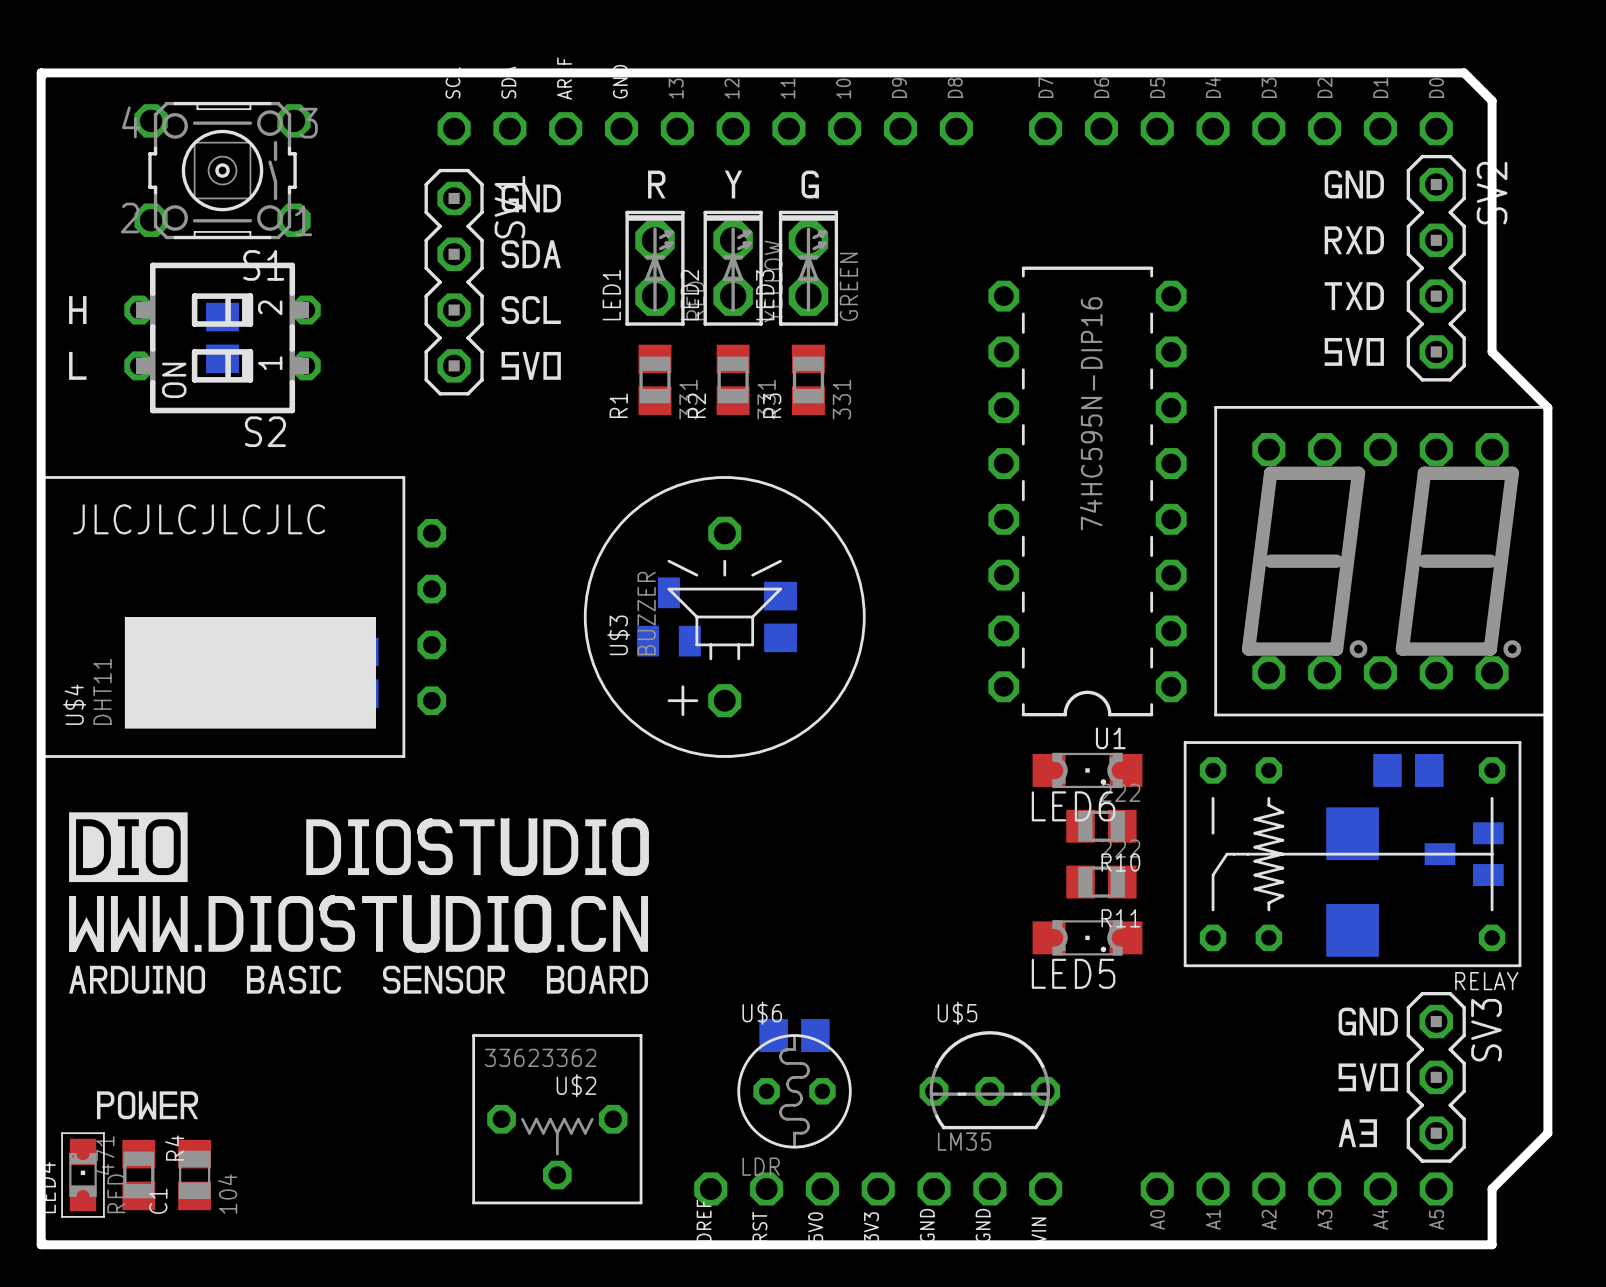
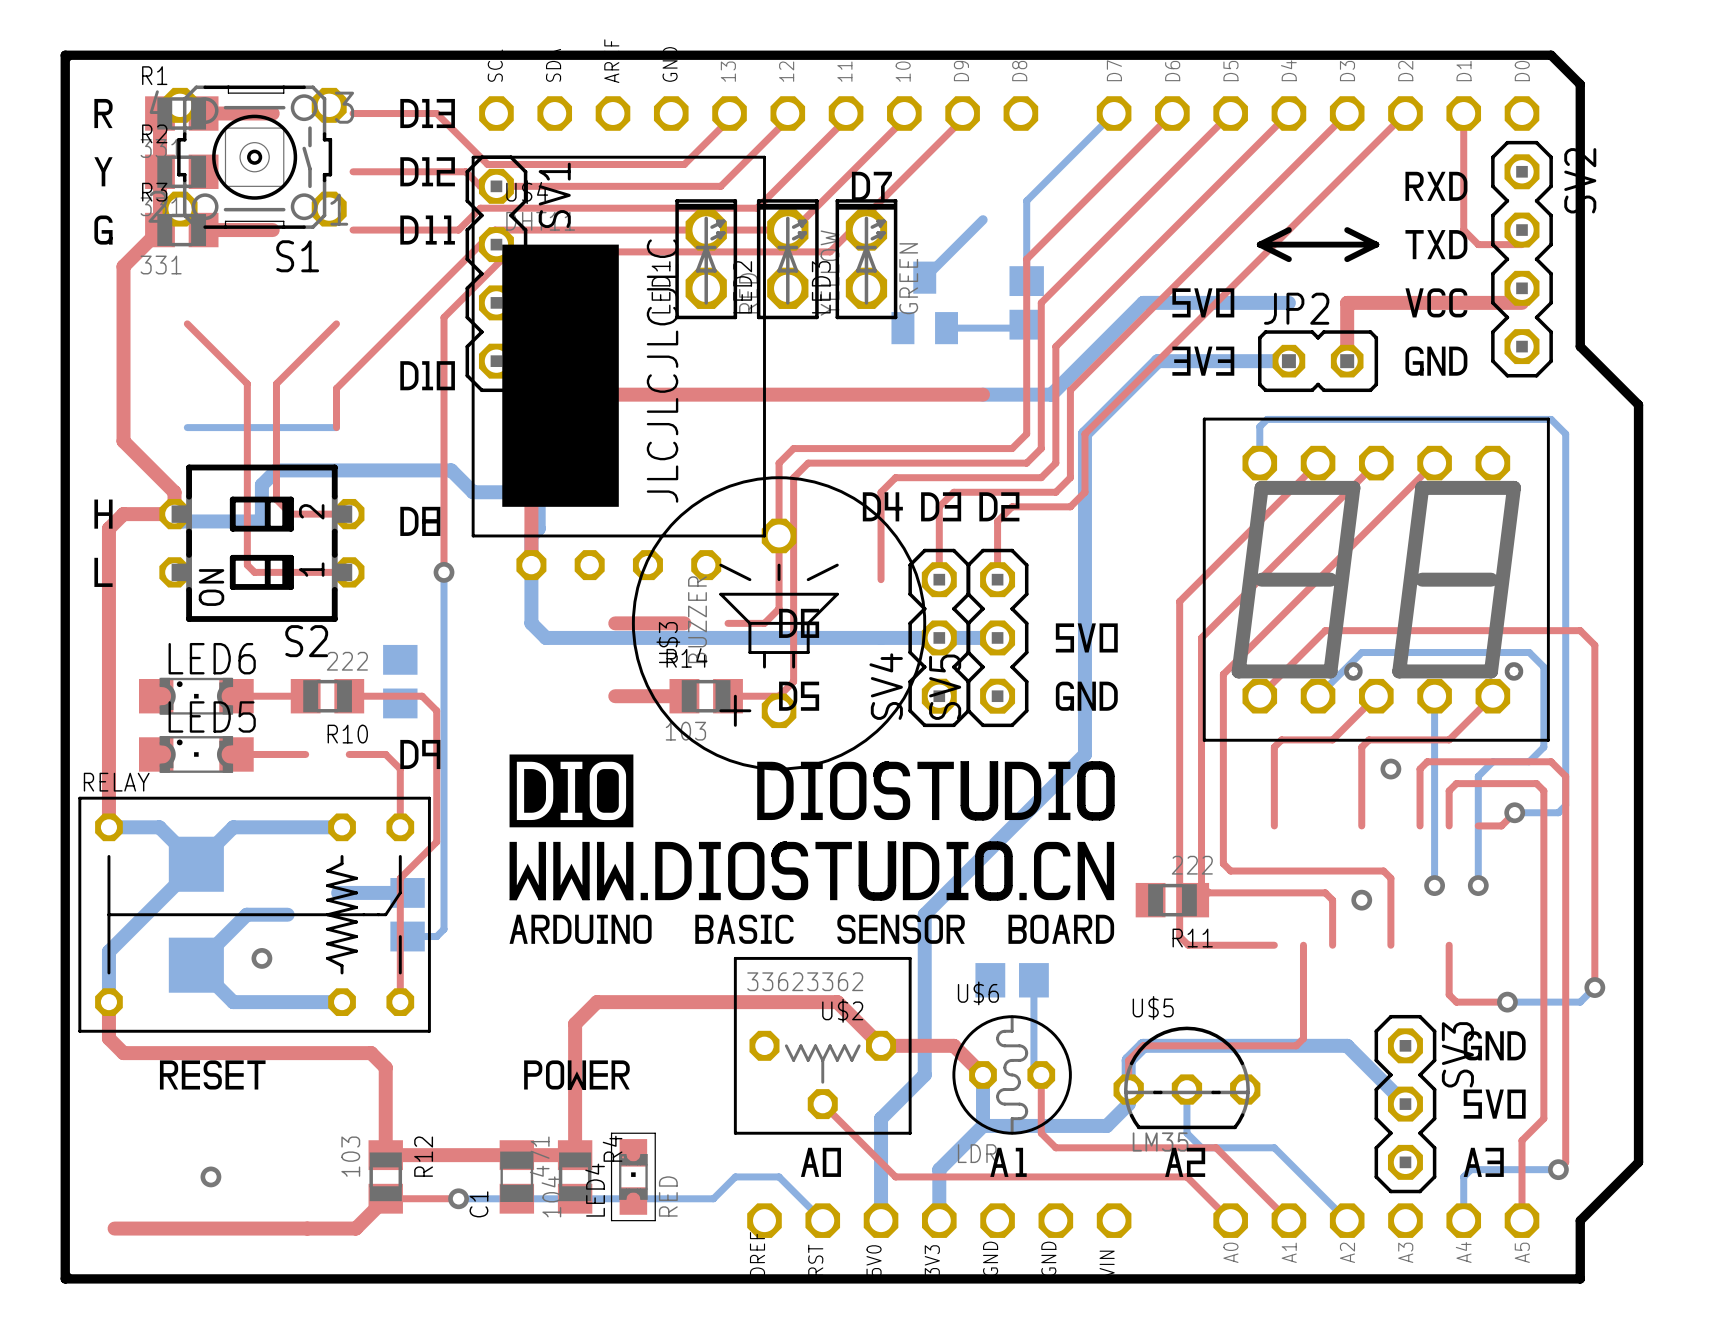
drawing: none -> [94, 98, 113, 129]
drawing: none -> [400, 98, 455, 129]
top track: none -> (160, 113) (160, 230) (123, 266) (123, 441) (174, 492) (174, 514) (123, 514) (108, 528) (108, 827)
top track: none -> (203, 113) (272, 113)
top track: none -> (353, 113) (436, 113) (487, 164) (684, 164) (735, 113)
top track: none -> (793, 113) (720, 186) (480, 186) (465, 171) (353, 171)
top track: none -> (851, 113) (757, 208) (480, 208) (458, 230) (353, 230)
top track: none -> (910, 113) (793, 230) (494, 230) (336, 388) (336, 427)
top track: none -> (968, 113) (830, 251) (509, 251) (444, 317) (444, 572)
bottom track: none -> (1114, 113) (1026, 200) (1026, 281)
top track: none -> (1172, 113) (1026, 259) (1026, 433) (1012, 448) (793, 448) (779, 463) (779, 608) (764, 623) (728, 623)
top track: none -> (1230, 113) (1041, 302) (1041, 448) (1026, 463) (808, 463) (793, 477) (793, 681) (779, 696) (728, 696)
top track: none -> (1288, 113) (1055, 346) (1055, 463) (1041, 477) (895, 477) (881, 492) (881, 579)
top track: none -> (1347, 113) (1070, 390) (1070, 477) (1055, 492) (953, 492) (939, 506) (939, 579)
top track: none -> (1405, 113) (1084, 433) (1084, 492) (1070, 506) (1012, 506) (997, 521) (997, 579)
top track: none -> (1463, 113) (1463, 230) (1478, 244) (1522, 244)
drawing: none -> [94, 157, 113, 187]
drawing: none -> [400, 157, 455, 187]
drawing: [648, 170, 666, 199] -> none
drawing: [724, 170, 743, 199] -> none
drawing shape: [801, 170, 819, 199] -> [851, 171, 892, 201]
drawing: [501, 184, 561, 213] -> none
drawing position: (1354, 184) -> (1436, 361)
drawing: none -> [94, 215, 113, 245]
drawing: none -> [400, 215, 455, 245]
bottom track: none -> (983, 219) (925, 277)
top track: none -> (203, 230) (272, 230)
drawing: [501, 240, 561, 269] -> none
line: none -> (1288, 230) (1259, 244)
line: none -> (1347, 230) (1376, 244)
drawing position: (1354, 240) -> (1436, 186)
line: none -> (1259, 244) (1376, 244)
line: none -> (1259, 244) (1288, 259)
line: none -> (1376, 244) (1347, 259)
drawing: [501, 296, 561, 325] -> none
drawing: none -> [1172, 288, 1235, 318]
drawing: none -> [1405, 288, 1468, 318]
drawing position: (1354, 296) -> (1436, 244)
drawing position: (77, 310) -> (103, 514)
part: none -> (1026, 302)
bottom track: none -> (1288, 302) (1143, 302) (1051, 394) (983, 394)
top track: none -> (1522, 302) (1347, 302) (1347, 361)
top track: none -> (187, 323) (247, 383) (247, 565) (254, 572) (349, 572)
top track: none -> (336, 323) (276, 383) (276, 499) (291, 514) (349, 514)
bottom track: none -> (1026, 324) (1023, 328) (946, 328)
S2 position: (222, 337) -> (261, 543)
part: (222, 337) -> none
drawing: [1324, 337, 1384, 366] -> none
drawing: [501, 351, 561, 380] -> none
drawing: none -> [1172, 346, 1235, 376]
drawing position: (77, 365) -> (103, 572)
drawing: none -> [400, 361, 455, 391]
bottom track: none -> (1288, 361) (1157, 361) (1084, 433) (1084, 754) (924, 914) (924, 1074) (881, 1118) (881, 1220)
JP2: none -> (1318, 361)
text: none -> JLCJLCJLCJLC (662, 371)
R1 rotation: 0° (655, 379) -> 90° clockwise (181, 113)
R1 position: (655, 379) -> (181, 113)
R2 rotation: 0° (733, 379) -> 90° clockwise (181, 171)
R2 position: (733, 379) -> (181, 171)
R3 rotation: 0° (808, 379) -> 90° clockwise (181, 230)
R3 position: (808, 379) -> (181, 230)
top track: none -> (983, 394) (548, 394) (531, 412) (531, 565)
bottom track: none -> (187, 427) (336, 427)
bottom track: none -> (1259, 463) (1259, 426) (1267, 419) (1551, 419) (1565, 433) (1565, 805) (1558, 812) (1514, 812)
top track: none -> (1318, 463) (1179, 601) (1179, 936) (1188, 945) (1274, 945)
top track: none -> (1376, 463) (1201, 637) (1201, 885) (1208, 892) (1325, 892) (1332, 900) (1332, 945)
top track: none -> (1434, 463) (1223, 674) (1223, 863) (1230, 871) (1383, 871) (1390, 878) (1390, 945)
drawing: none -> [862, 492, 1020, 522]
U1: 74HC595N-DIP16 (1087, 491) -> none
drawing: none -> [400, 506, 441, 536]
bottom track: none -> (174, 514) (181, 521) (261, 521) (261, 484) (276, 470) (451, 470) (473, 492) (538, 492) (538, 528) (531, 535) (531, 623) (545, 637) (997, 637)
text: JLCJLCJLCJLC (199, 519) -> none
part position: (1380, 561) -> (1376, 579)
bottom track: none -> (444, 572) (444, 929) (436, 936) (407, 936)
via: none -> (444, 572)
drawing: none -> [779, 608, 820, 638]
U$4 rotation: 0° (242, 616) -> 90° clockwise (618, 367)
U$4 position: (242, 616) -> (618, 367)
top track: none -> (615, 623) (684, 623)
part position: (668, 616) -> (924, 302)
part: (780, 616) -> none
drawing: none -> [1055, 623, 1118, 653]
SV4: none -> (939, 637)
SV5: none -> (997, 637)
drawing: none -> [779, 681, 820, 711]
drawing: none -> [1055, 681, 1118, 711]
top track: none -> (236, 696) (305, 696)
top track: none -> (349, 696) (422, 696) (436, 710) (436, 841) (400, 878) (400, 1002)
top track: none -> (615, 696) (684, 696)
R14: none -> 103 (706, 696)
top track: none -> (1259, 696) (1325, 630) (1580, 630) (1594, 645) (1594, 987)
bottom track: none -> (1318, 696) (1361, 652) (1529, 652) (1543, 667) (1543, 747) (1529, 761) (1492, 761) (1478, 776) (1478, 885)
top track: none -> (1376, 696) (1332, 739) (1281, 739) (1274, 747) (1274, 825)
bottom track: none -> (1434, 696) (1434, 885)
top track: none -> (1492, 696) (1449, 739) (1369, 739) (1361, 747) (1361, 825)
drawing: none -> [400, 739, 441, 770]
top track: none -> (236, 754) (305, 754)
top track: none -> (349, 754) (385, 754) (400, 769) (400, 827)
via: none -> (1390, 769)
LED6 rotation: 0° (1087, 770) -> 180° (196, 696)
LED6 position: (1087, 770) -> (196, 696)
part: (1408, 770) -> none
top track: none -> (1514, 812) (1501, 825) (1478, 825)
via: none -> (1514, 812)
top track: none -> (1420, 825) (1420, 769) (1427, 761) (1551, 761) (1565, 776) (1565, 1162) (1558, 1169)
top track: none -> (1449, 825) (1449, 790) (1456, 783) (1536, 783) (1543, 790) (1543, 1118) (1522, 1140) (1522, 1220)
bottom track: none -> (108, 827) (159, 827) (196, 864)
bottom track: none -> (342, 827) (233, 827) (108, 951) (108, 1002)
R10 position: (1101, 826) -> (327, 696)
drawing position: (128, 847) -> (571, 790)
drawing position: (477, 847) -> (935, 790)
RELAY: (1352, 854) -> none
part: (1464, 854) -> none
via: none -> (1434, 885)
via: none -> (1478, 885)
bottom track: none -> (338, 892) (407, 892)
via: none -> (1361, 900)
part: (1352, 882) -> none
part: none -> (196, 914)
RELAY: none -> (254, 914)
bottom track: none -> (287, 914) (246, 914) (196, 965) (233, 1002) (342, 1002)
part: none -> (407, 914)
drawing position: (358, 923) -> (811, 871)
top track: none -> (1303, 945) (1303, 1038) (1296, 1045) (1143, 1045) (1128, 1060) (1128, 1089)
top track: none -> (1449, 945) (1449, 994) (1456, 1002) (1507, 1002)
via: none -> (261, 958)
LED5 rotation: 0° (1087, 937) -> 180° (196, 754)
LED5 position: (1087, 937) -> (196, 754)
bottom track: none -> (1033, 980) (1033, 1067) (1041, 1074)
bottom track: none -> (1594, 987) (1580, 1002) (1507, 1002)
via: none -> (1594, 987)
top track: none -> (108, 1002) (108, 1038) (123, 1053) (371, 1053) (385, 1067) (385, 1155) (575, 1155) (575, 1023) (596, 1002) (837, 1002) (881, 1045) (953, 1045) (983, 1074)
drawing position: (358, 979) -> (811, 929)
via: none -> (1507, 1002)
drawing position: (1368, 1021) -> (1494, 1045)
U$5 footprint: [919, 1031, 1061, 1130] -> [1113, 1026, 1261, 1130]
drawing: none -> [159, 1060, 266, 1090]
part position: (794, 1035) -> (1012, 980)
bottom track: none -> (983, 1074) (983, 1125)
top track: none -> (1041, 1074) (1041, 1133) (1055, 1147) (1216, 1147) (1288, 1220)
bottom track: none -> (1186, 1089) (1186, 1133) (1201, 1147) (1274, 1147) (1347, 1220)
top track: none -> (822, 1104) (895, 1176) (1186, 1176) (1230, 1220)
bottom track: none -> (1405, 1104) (1347, 1045) (1143, 1045) (1128, 1060) (1128, 1104) (1106, 1125) (983, 1125)
drawing position: (1368, 1077) -> (1494, 1104)
SV3 position: (1436, 1077) -> (1405, 1104)
U$6 position: (794, 1091) -> (1012, 1074)
bottom track: none -> (983, 1125) (939, 1169) (939, 1220)
drawing position: (147, 1105) -> (576, 1074)
U$2 position: (557, 1119) -> (822, 1045)
drawing: none -> [800, 1147, 841, 1177]
drawing: none -> [990, 1147, 1027, 1177]
drawing: none -> [1165, 1147, 1206, 1177]
drawing position: (1357, 1133) -> (1483, 1162)
bottom track: none -> (1558, 1169) (1471, 1169) (1463, 1176) (1463, 1220)
via: none -> (1558, 1169)
via: none -> (210, 1176)
R12: none -> 103 (385, 1176)
top track: none -> (458, 1198) (385, 1198) (355, 1228) (114, 1228)
bottom track: none -> (458, 1198) (713, 1198) (735, 1176) (779, 1176) (822, 1220)
via: none -> (458, 1198)
LED4 position: (83, 1175) -> (633, 1176)
R4 position: (138, 1175) -> (575, 1176)
C1 position: (194, 1175) -> (516, 1176)

